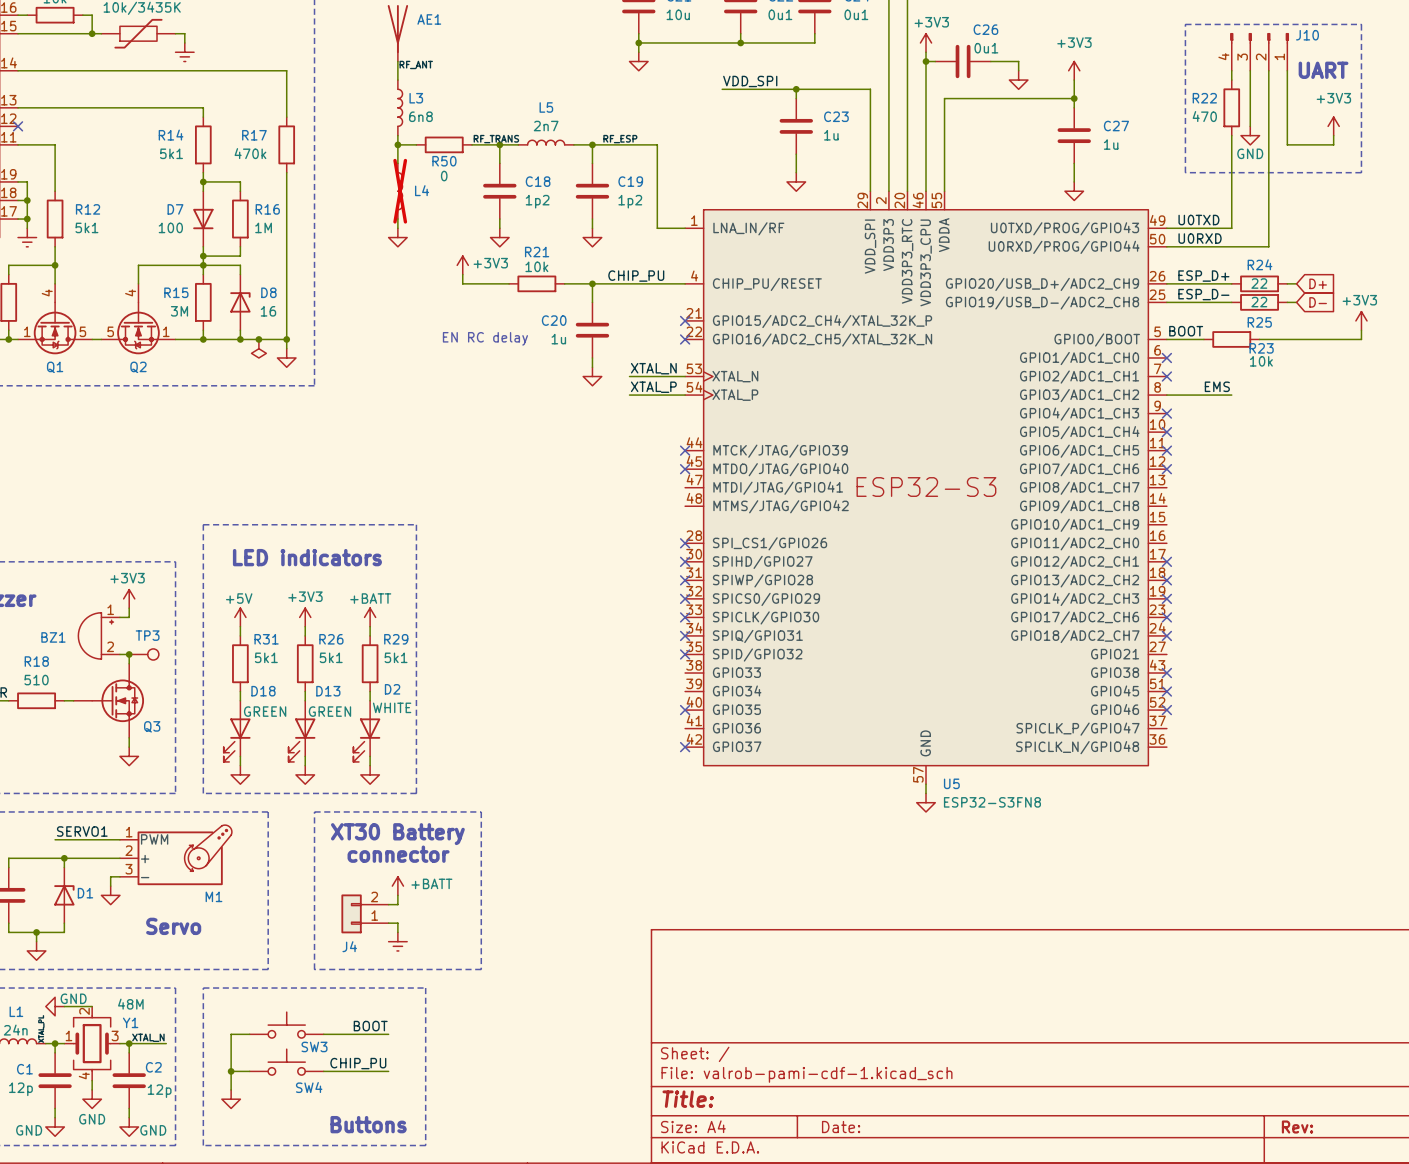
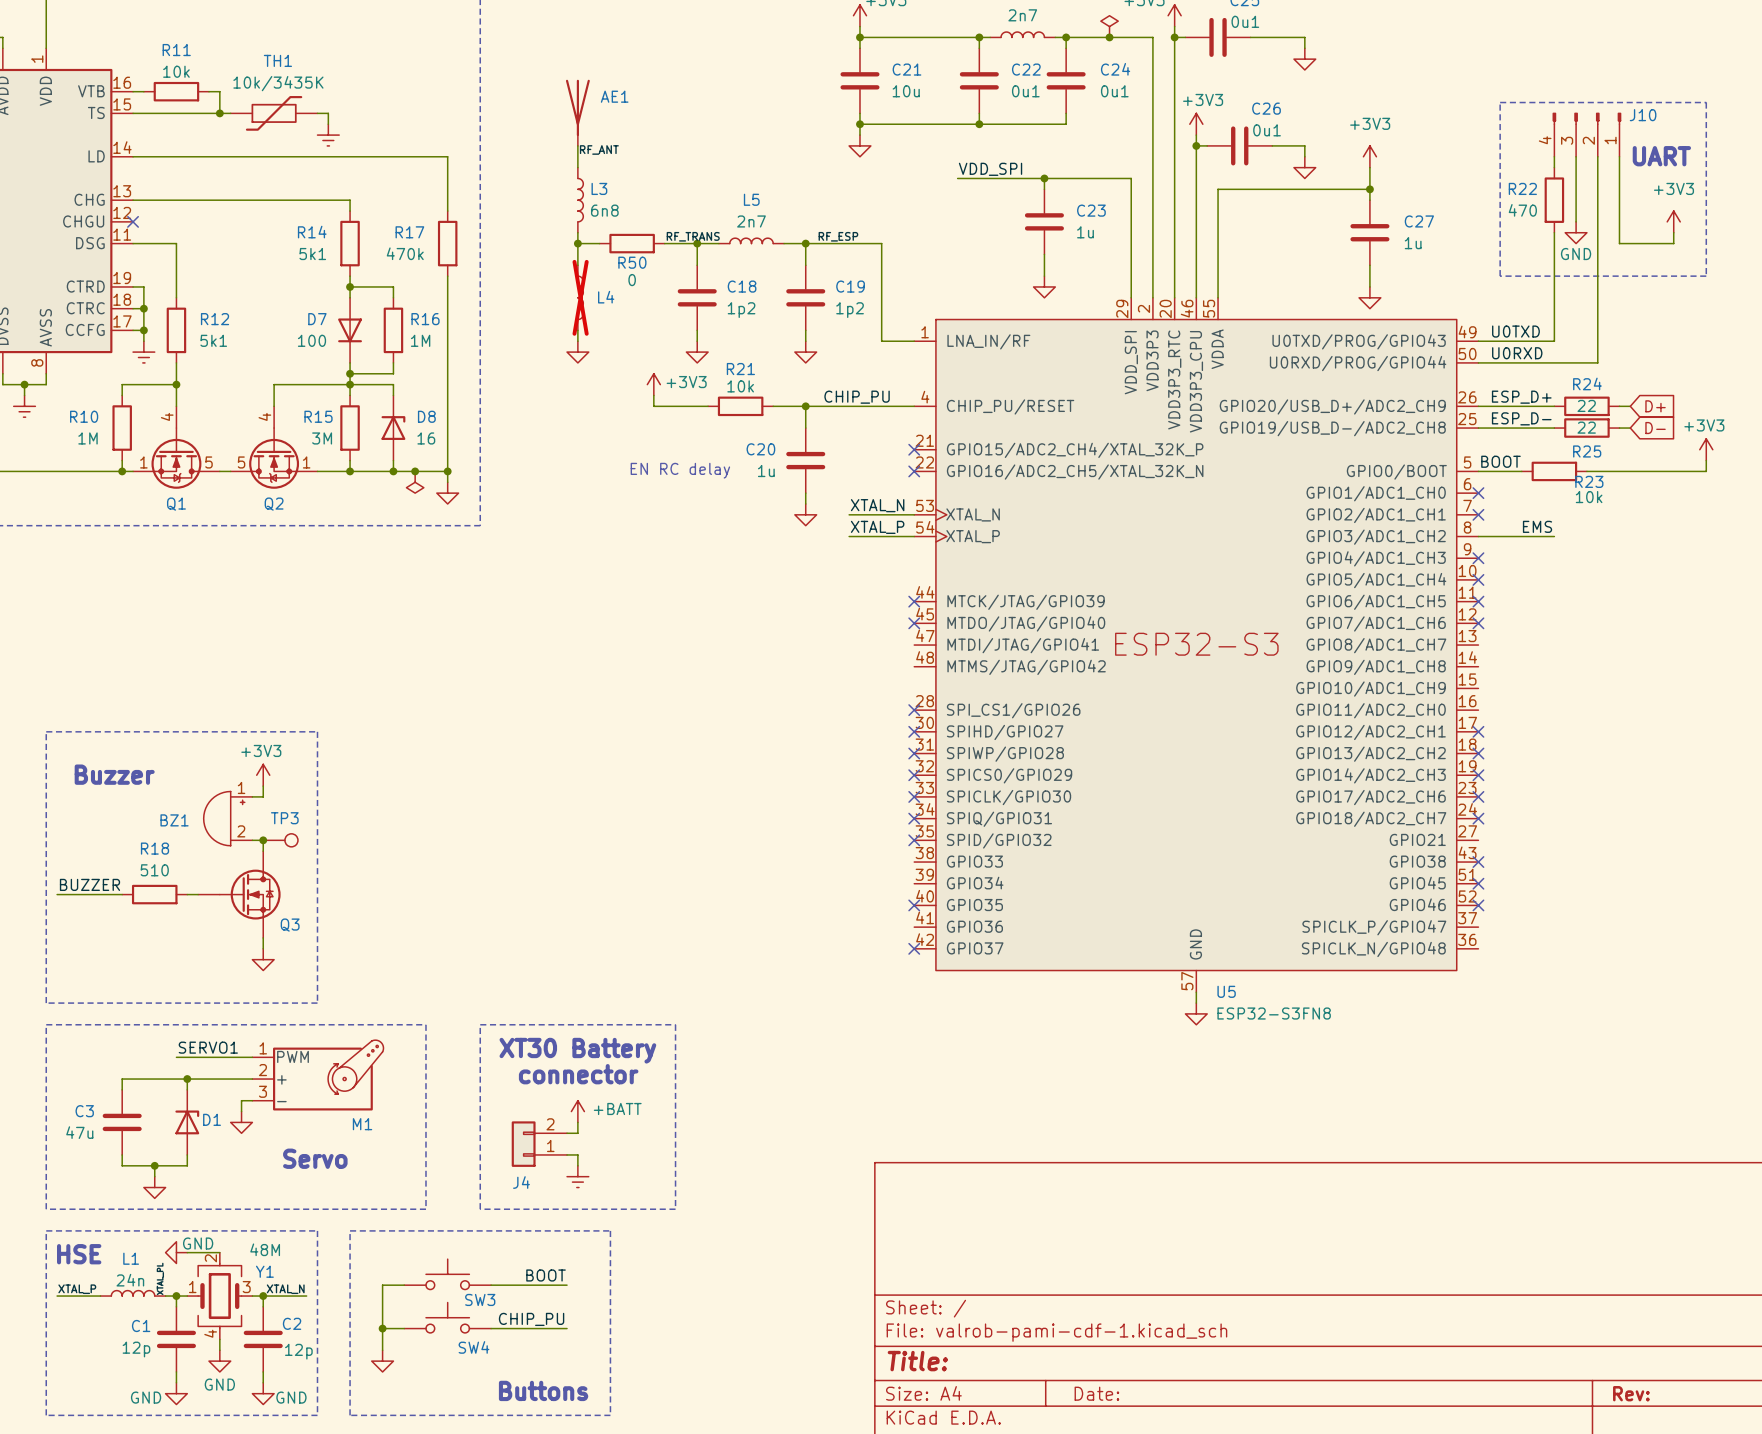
line: (203, 524) (416, 524) (416, 793) (203, 793) (203, 524) -> none
text: LED indicators (307, 557) -> none
power symbol: +5V (240, 617) -> none
power symbol: +3V3 (305, 617) -> none
power symbol: +BATT (370, 617) -> none
wire: (240, 626) (240, 635) -> none
wire: (305, 626) (305, 635) -> none
wire: (370, 626) (370, 635) -> none
R31: 5k1 (240, 663) -> none
R26: 5k1 (305, 663) -> none
R29: 5k1 (370, 663) -> none
wire: (240, 691) (240, 700) -> none
wire: (305, 691) (305, 700) -> none
wire: (370, 691) (370, 700) -> none
D18: GREEN (237, 731) -> none
D13: GREEN (302, 731) -> none
D2: WHITE (366, 731) -> none
wire: (240, 756) (240, 765) -> none
wire: (305, 756) (305, 765) -> none
wire: (370, 756) (370, 765) -> none
power symbol: (240, 774) -> none
power symbol: (305, 774) -> none
power symbol: (370, 774) -> none

